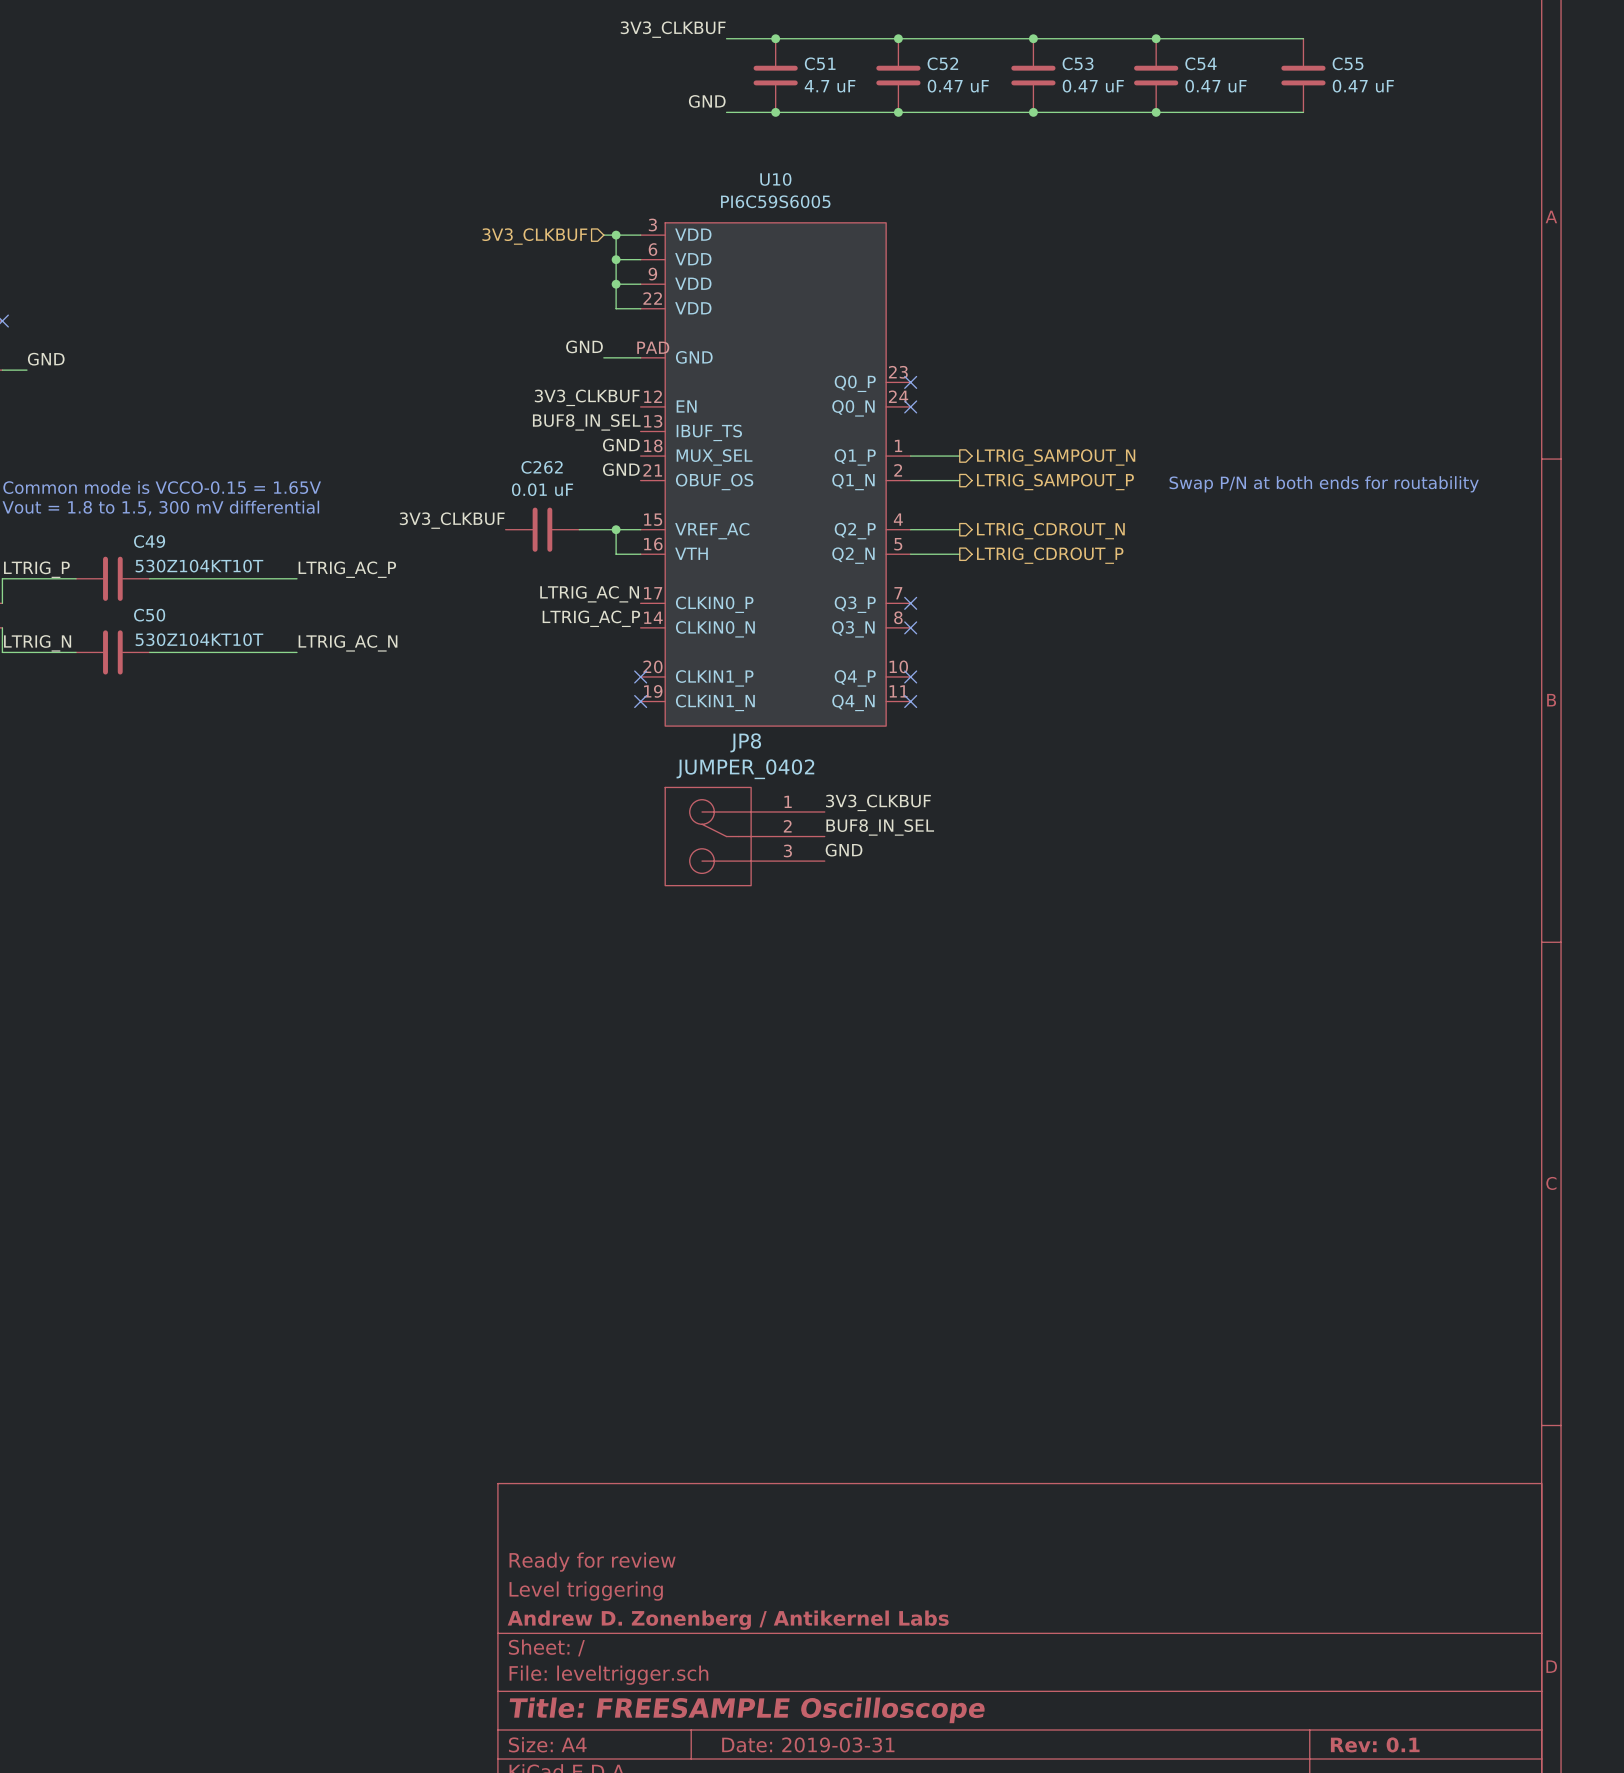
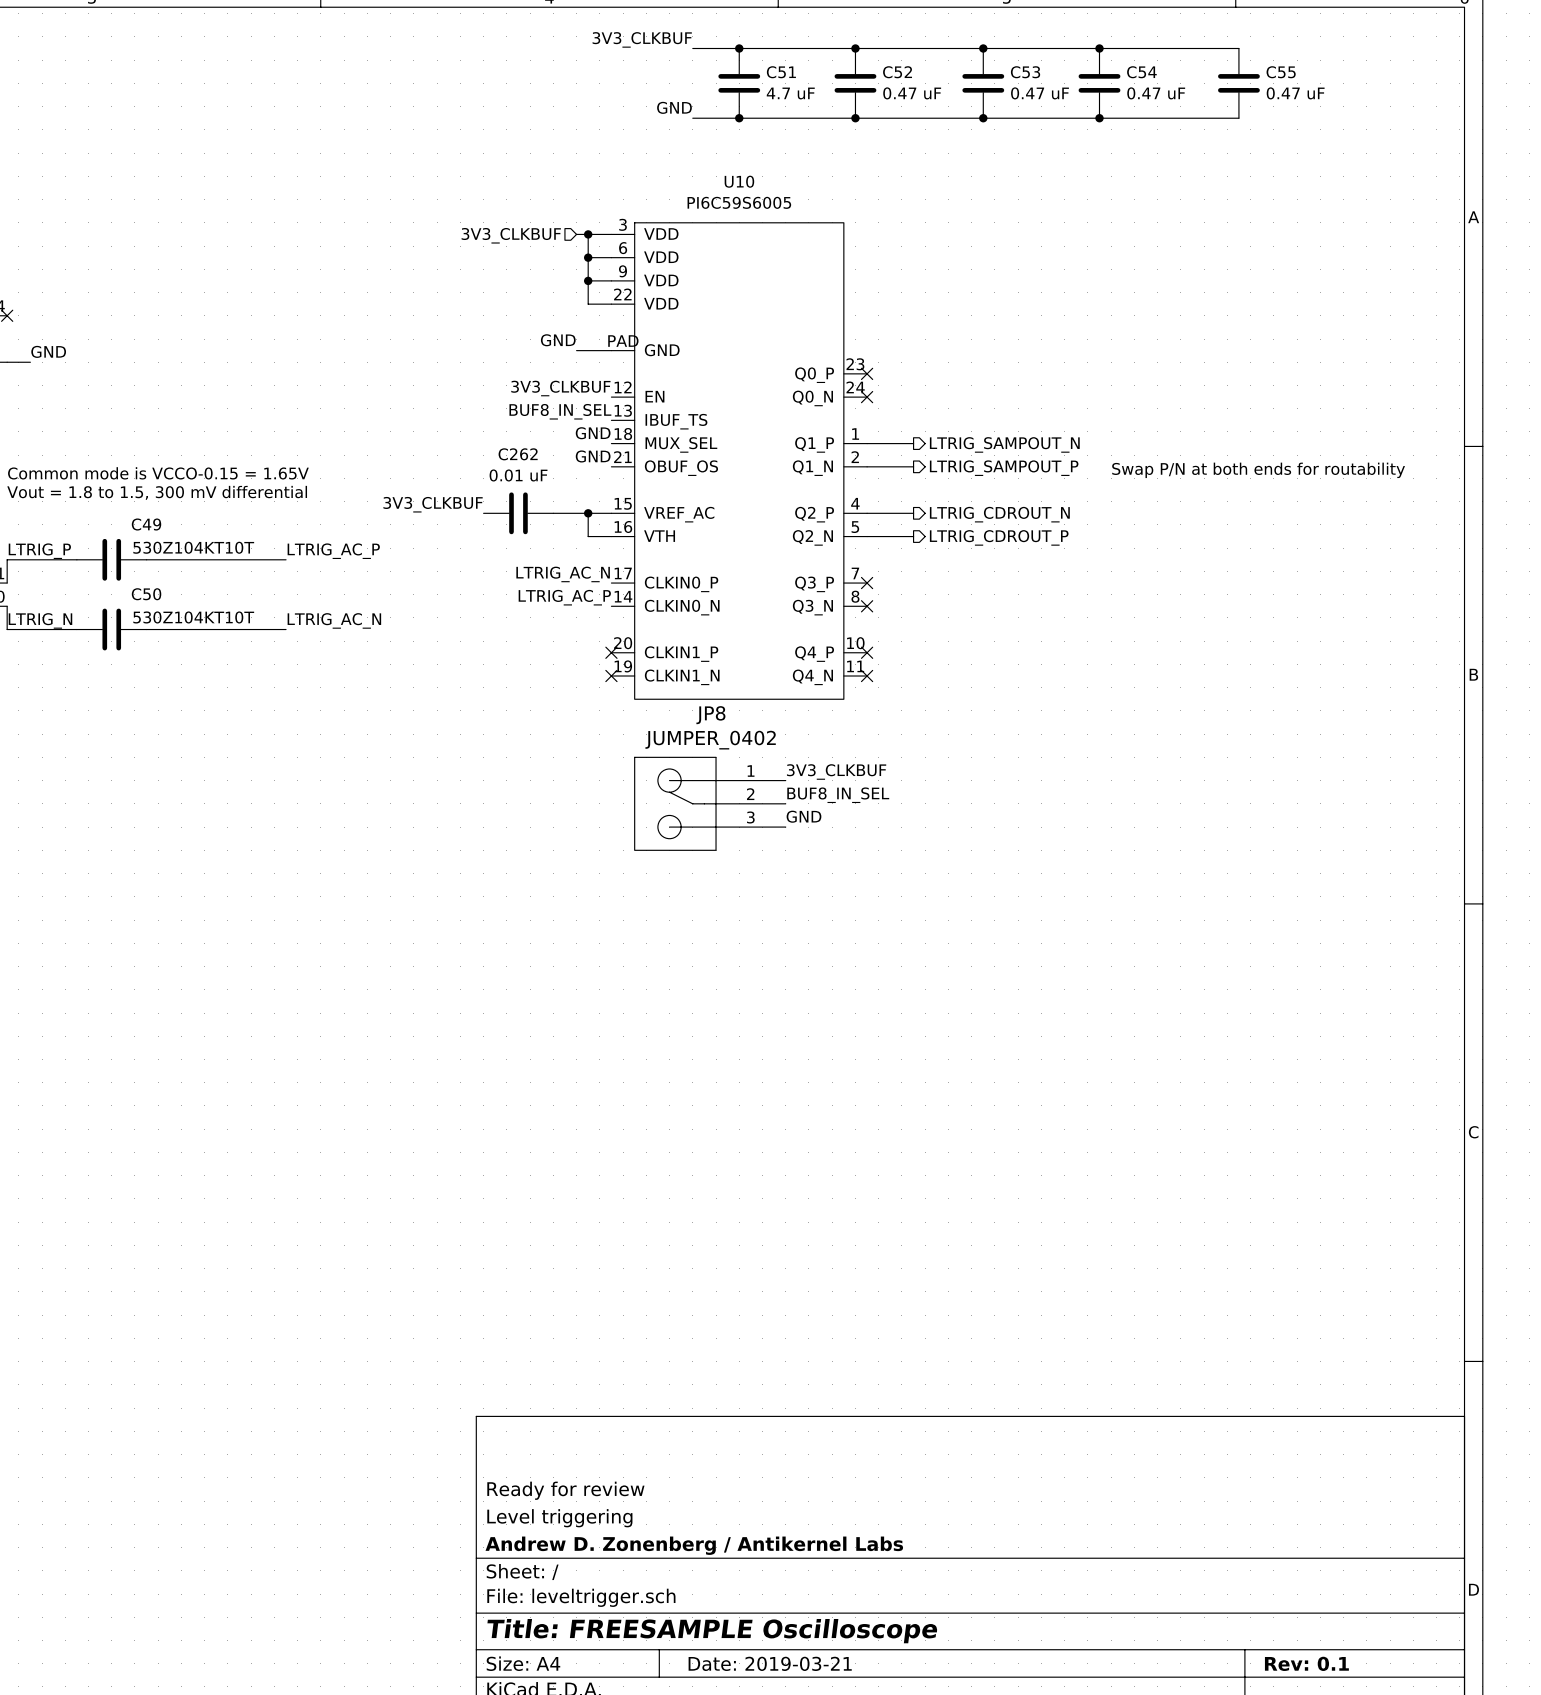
title block: Date: 2019-03-31 (808, 1744) -> Date: 2019-03-21 (770, 1663)

